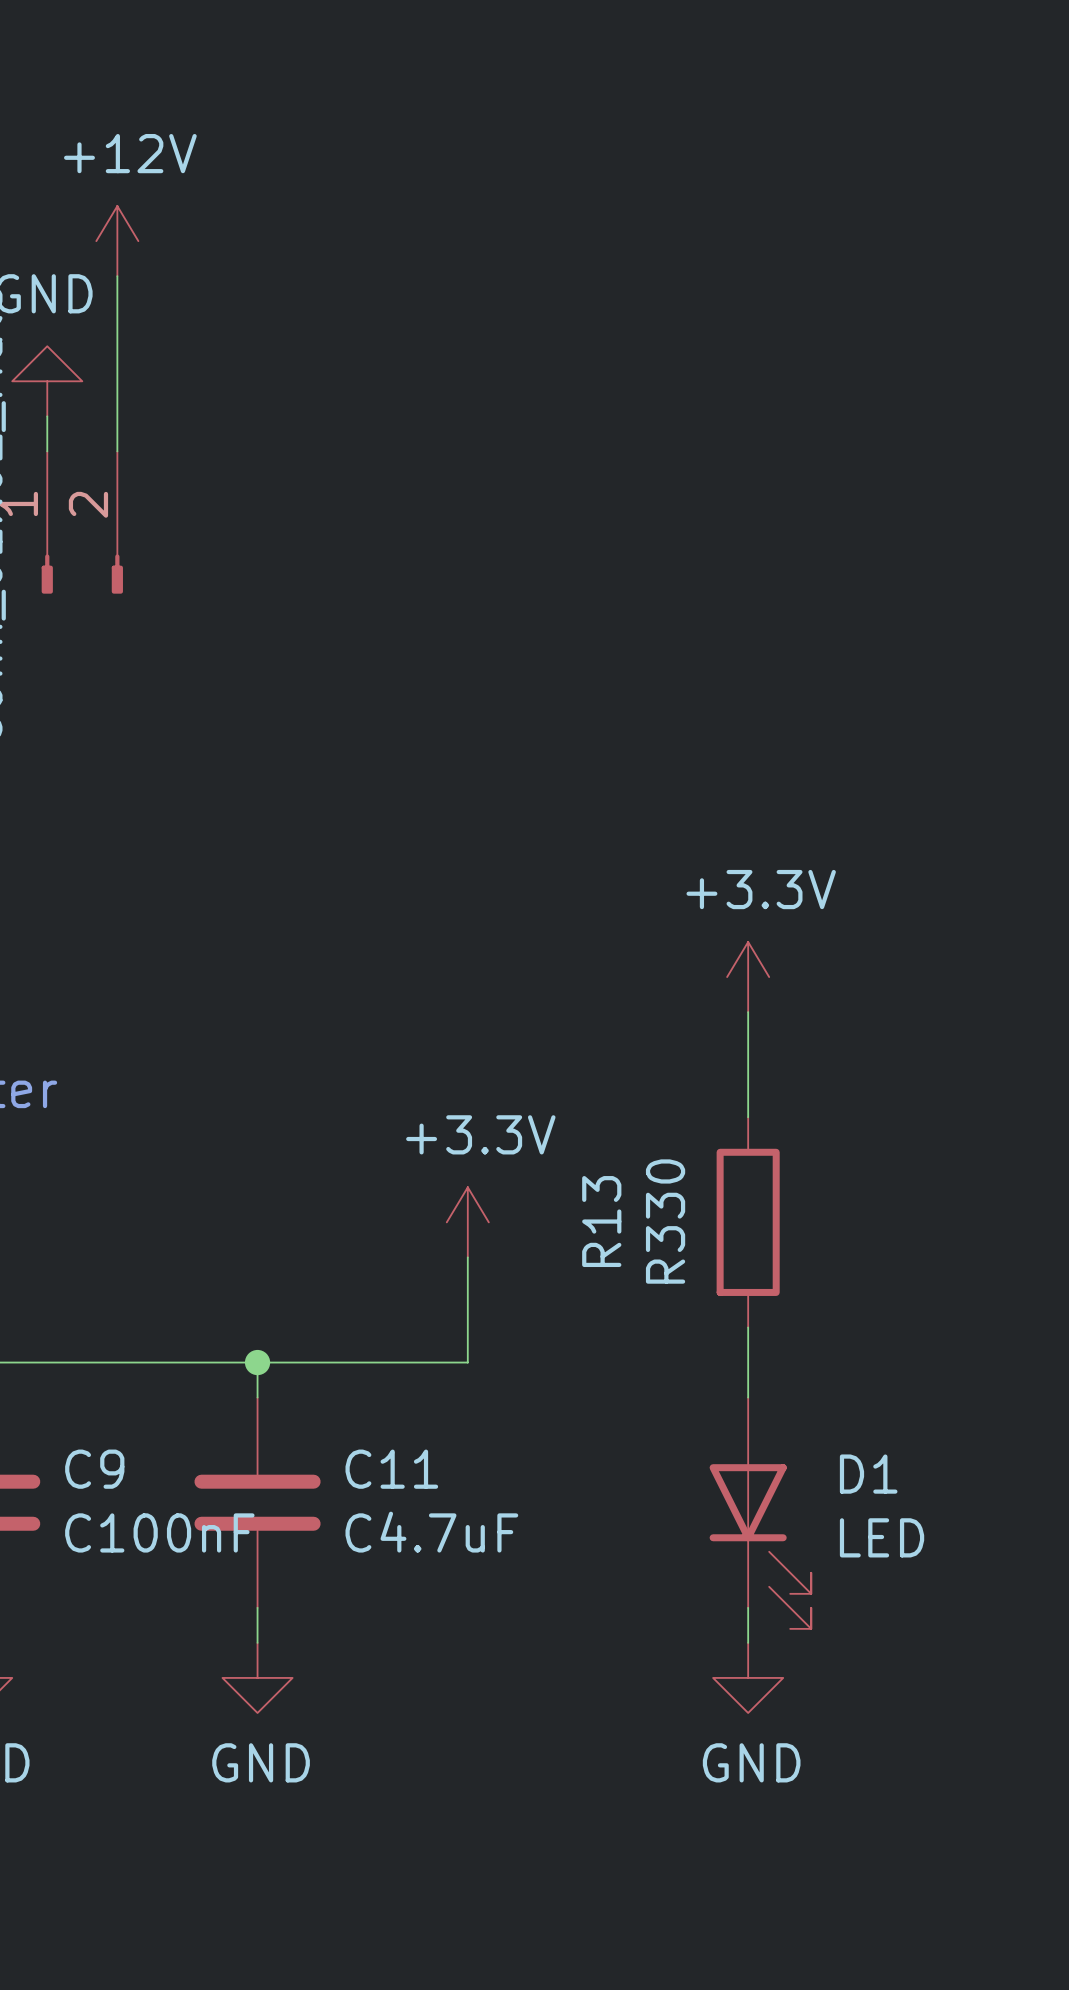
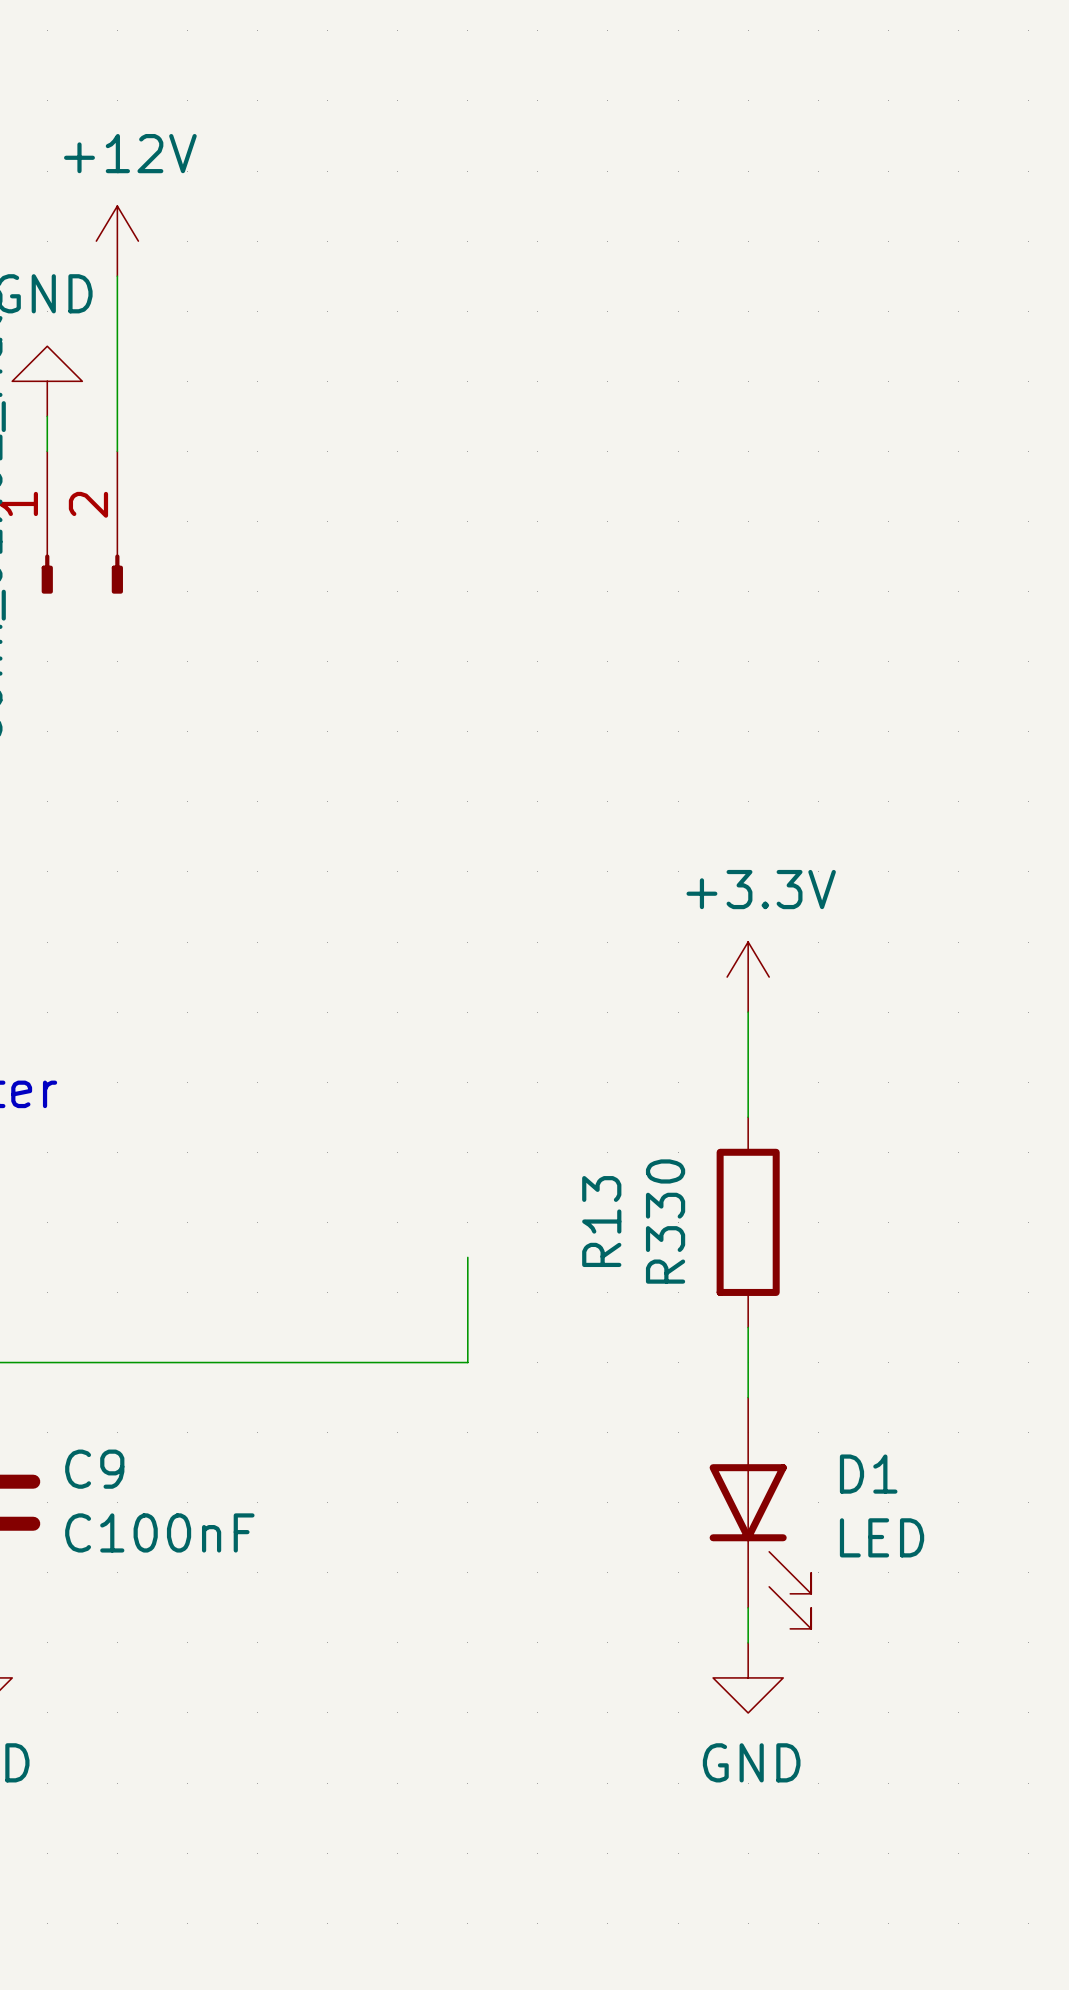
power symbol: +3.3V (467, 1222) -> none
wire: (257, 1362) (257, 1397) -> none
junction: (257, 1362) -> none
C11: C4.7uF (257, 1502) -> none
wire: (257, 1607) (257, 1642) -> none
power symbol: GND (257, 1677) -> none

